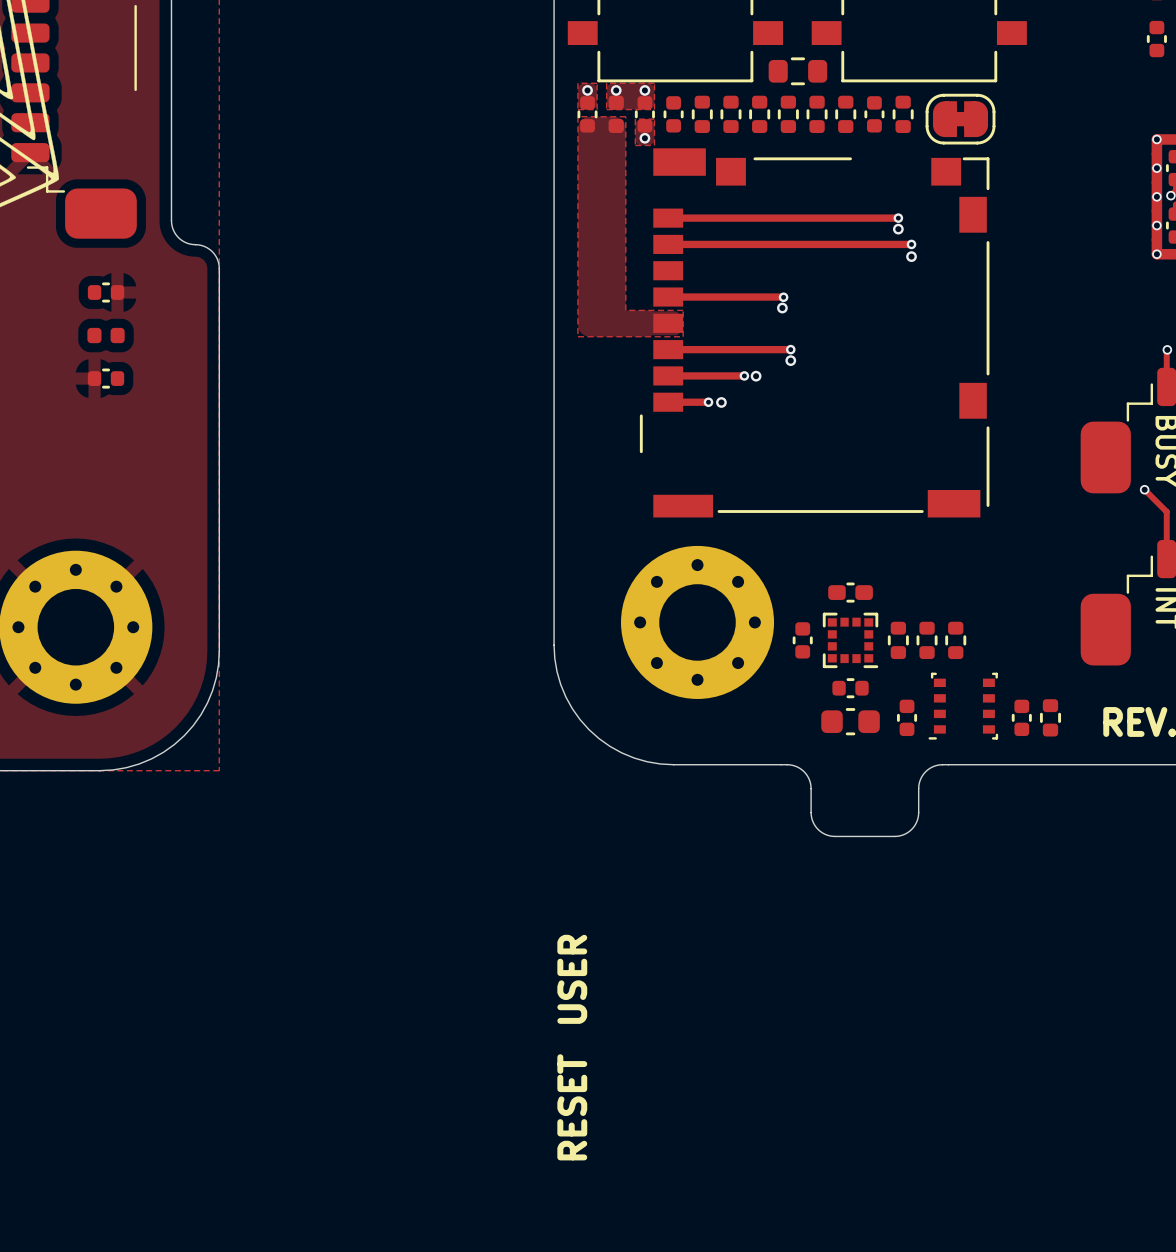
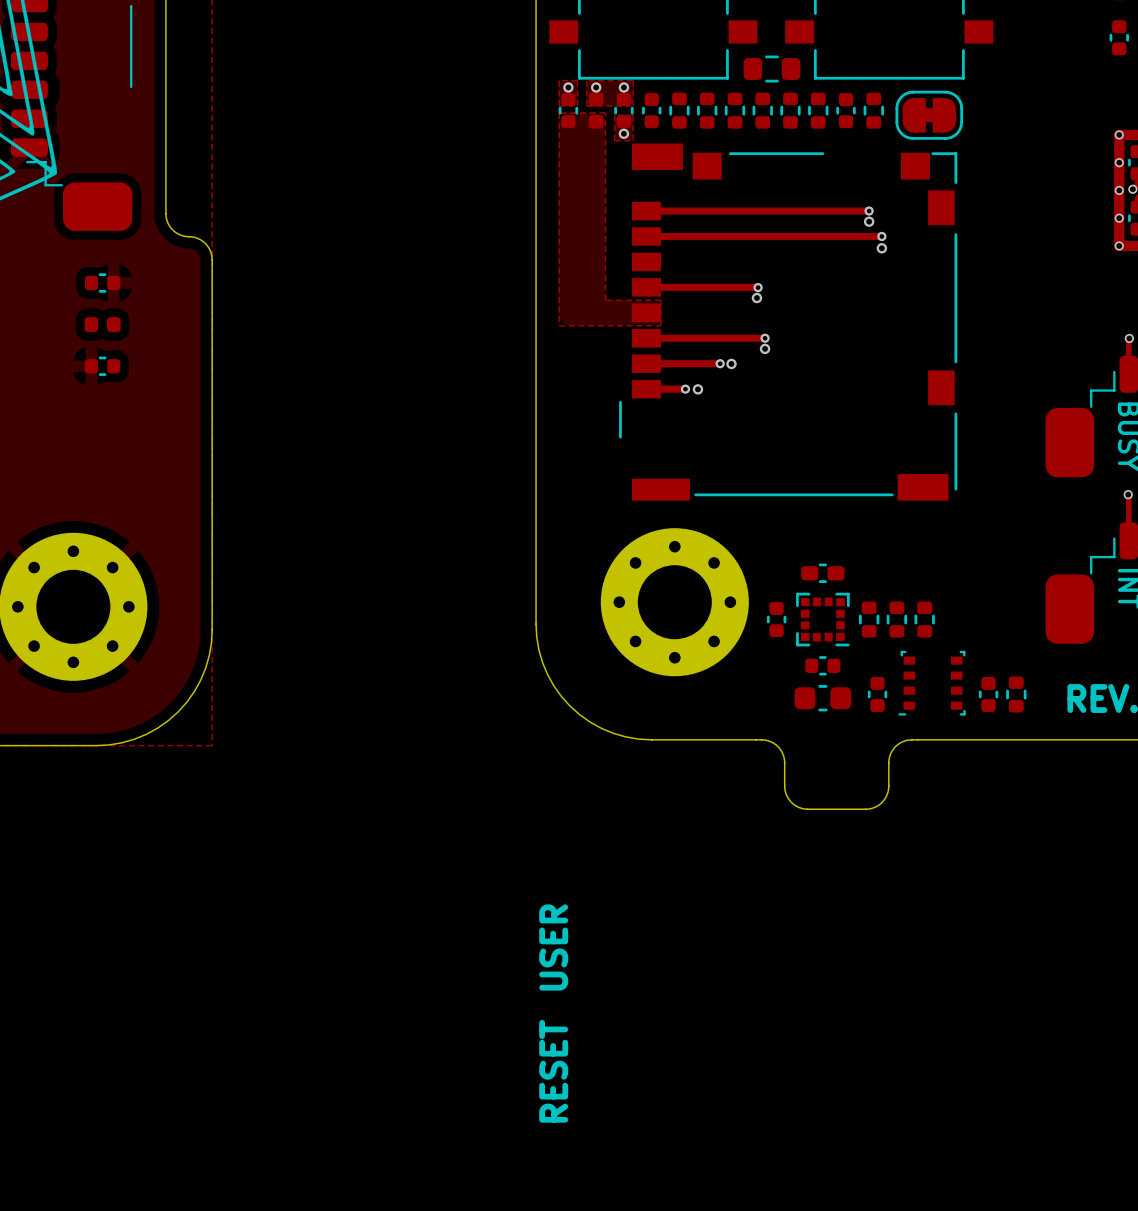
track: (1144, 489) (1166, 511) -> none
via: (1144, 489) -> none
via: none -> (1128, 494)

